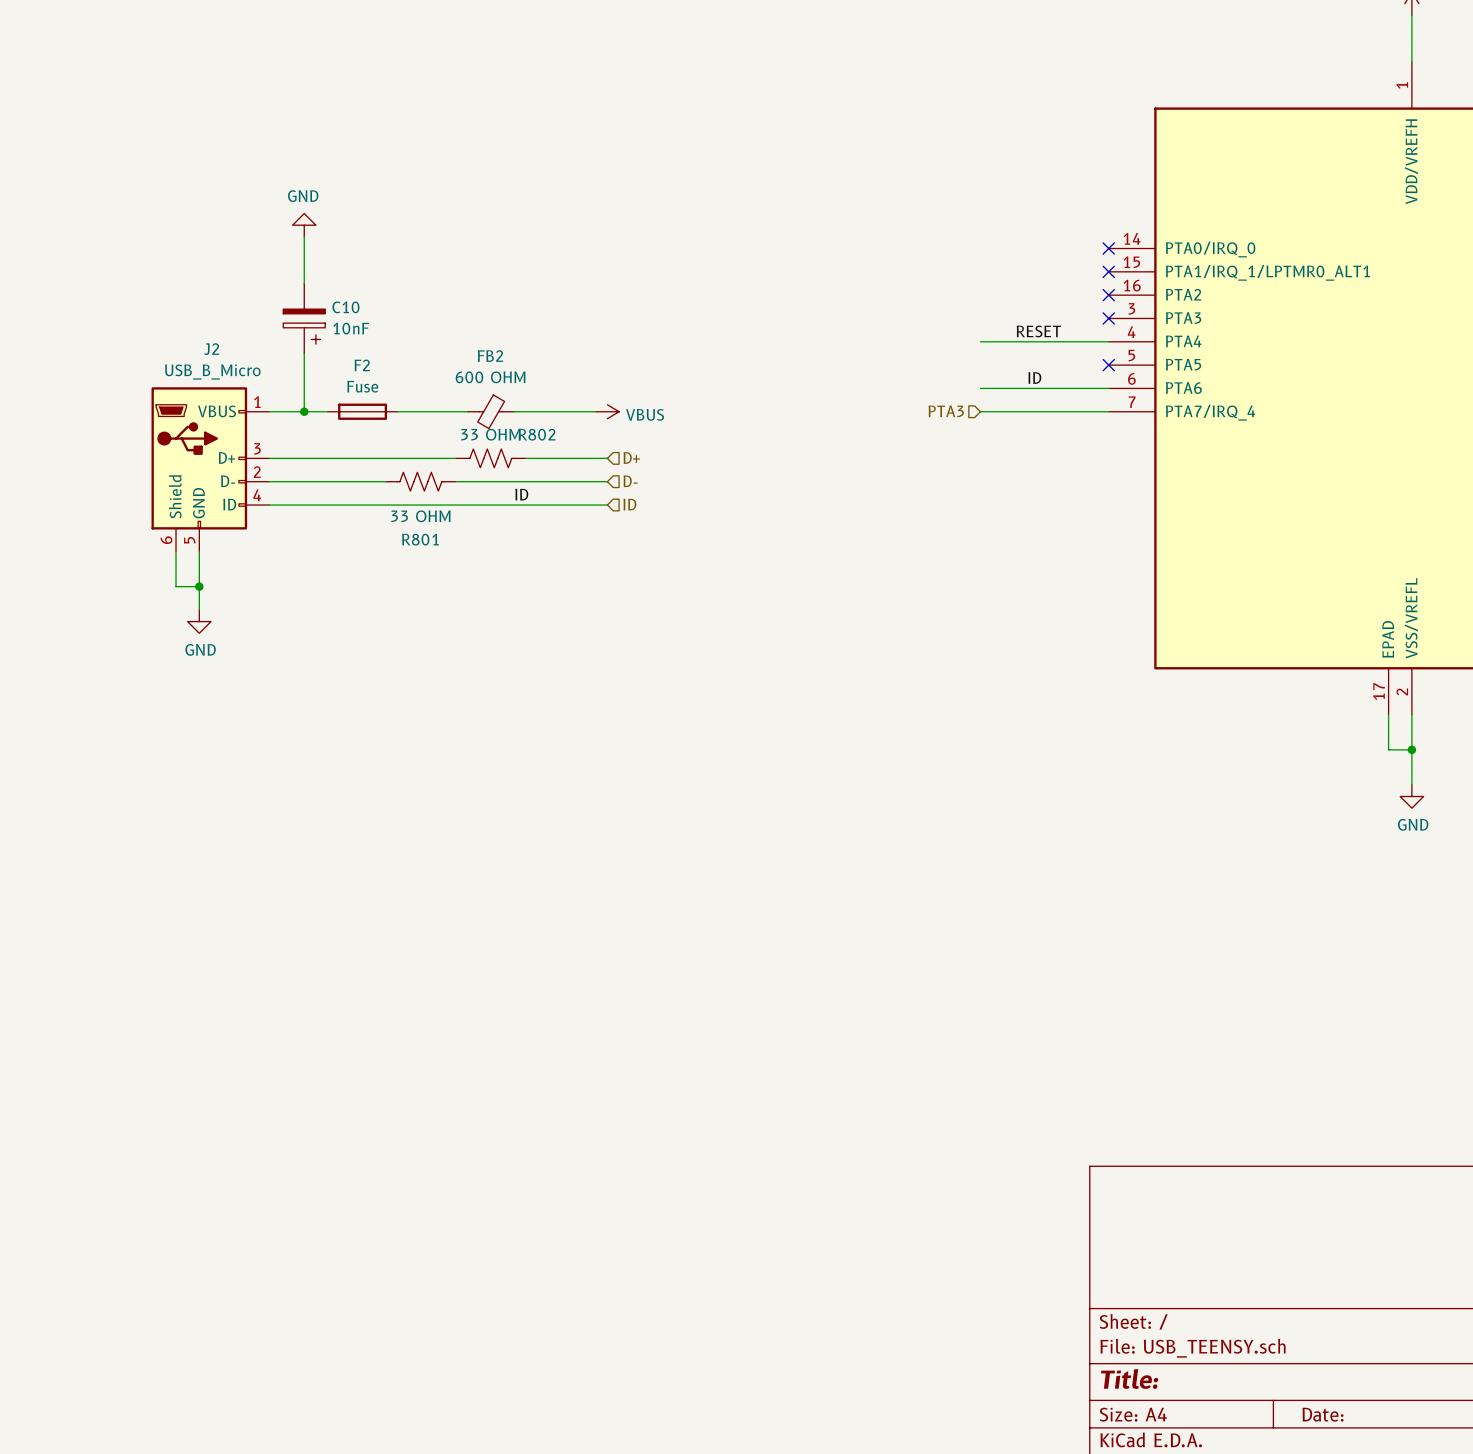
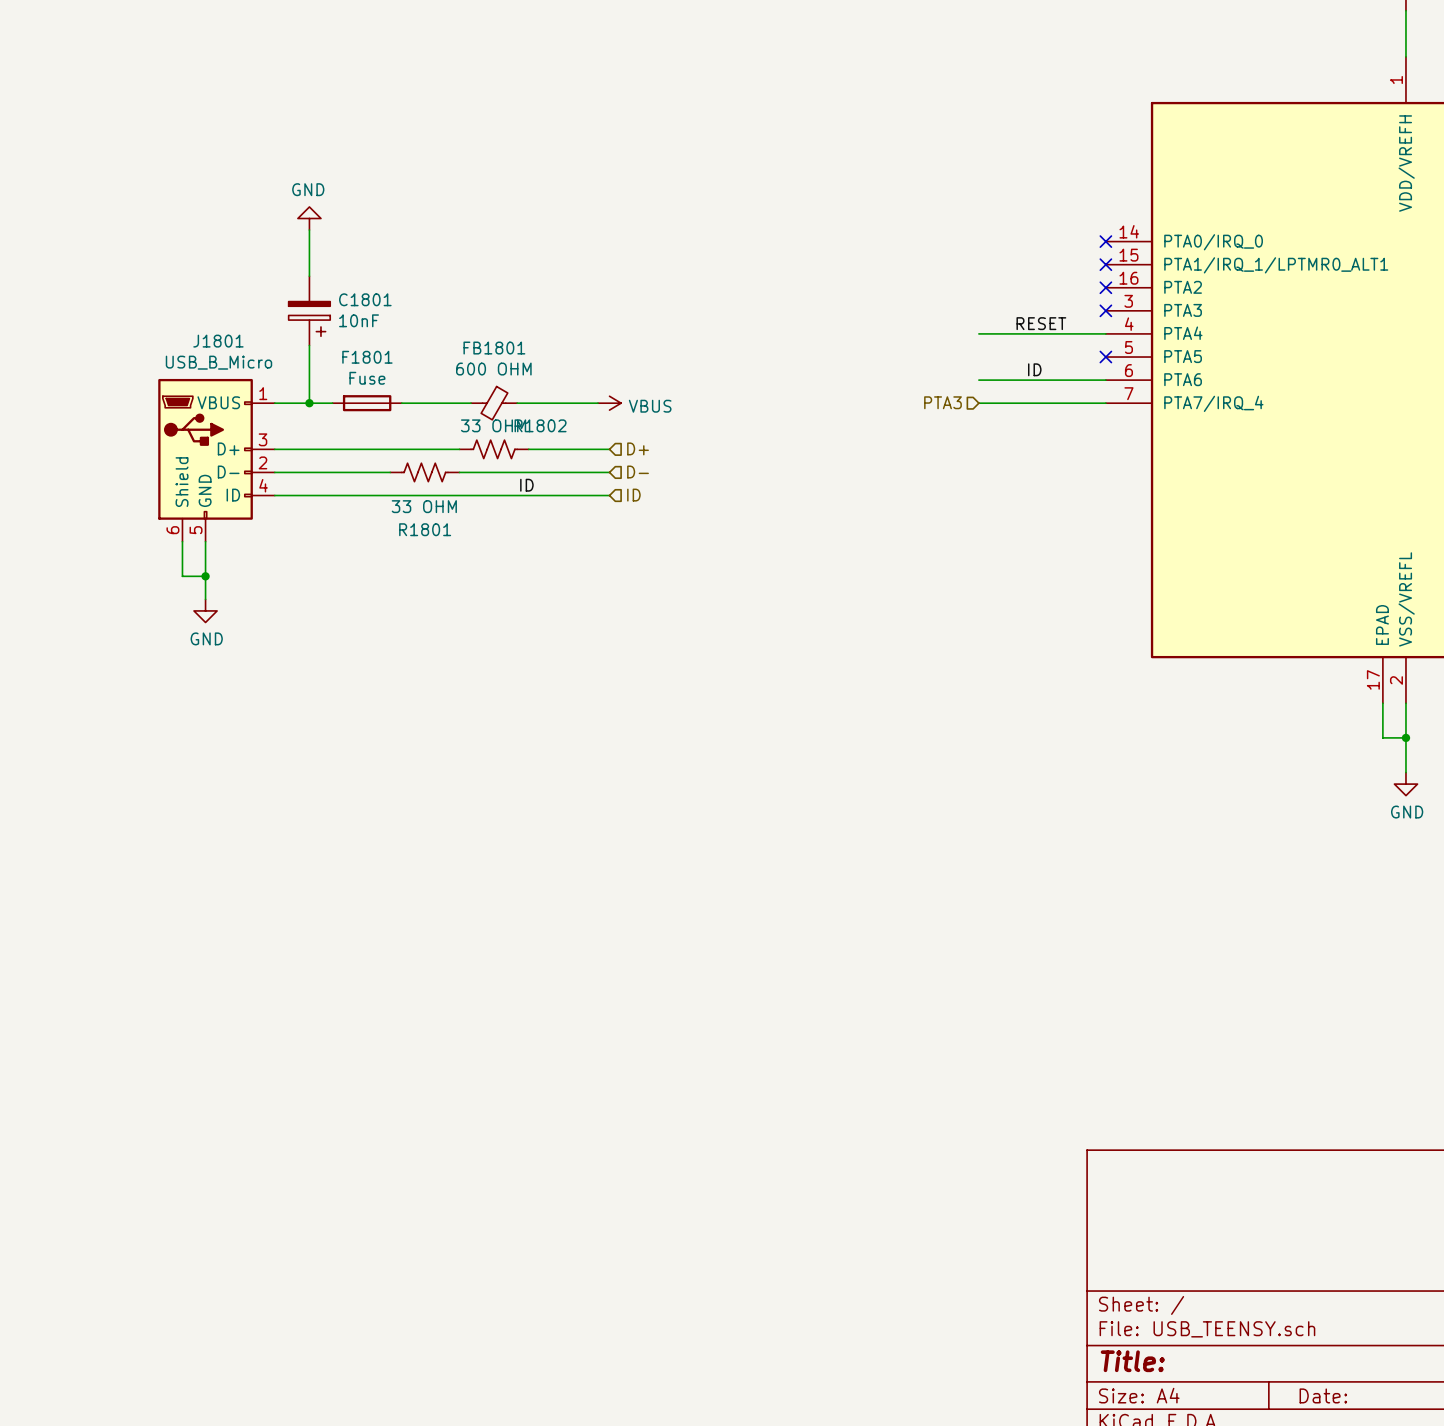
C10 name: C10 (345, 307) -> C1801 (365, 299)
J2 name: J2 (211, 349) -> J1801 (218, 341)
FB2 name: FB2 (490, 356) -> FB1801 (494, 348)
F2 name: F2 (362, 365) -> F1801 (367, 357)
R802 name: R802 (537, 434) -> R1802 (540, 425)
R801 name: R801 (420, 539) -> R1801 (425, 529)

